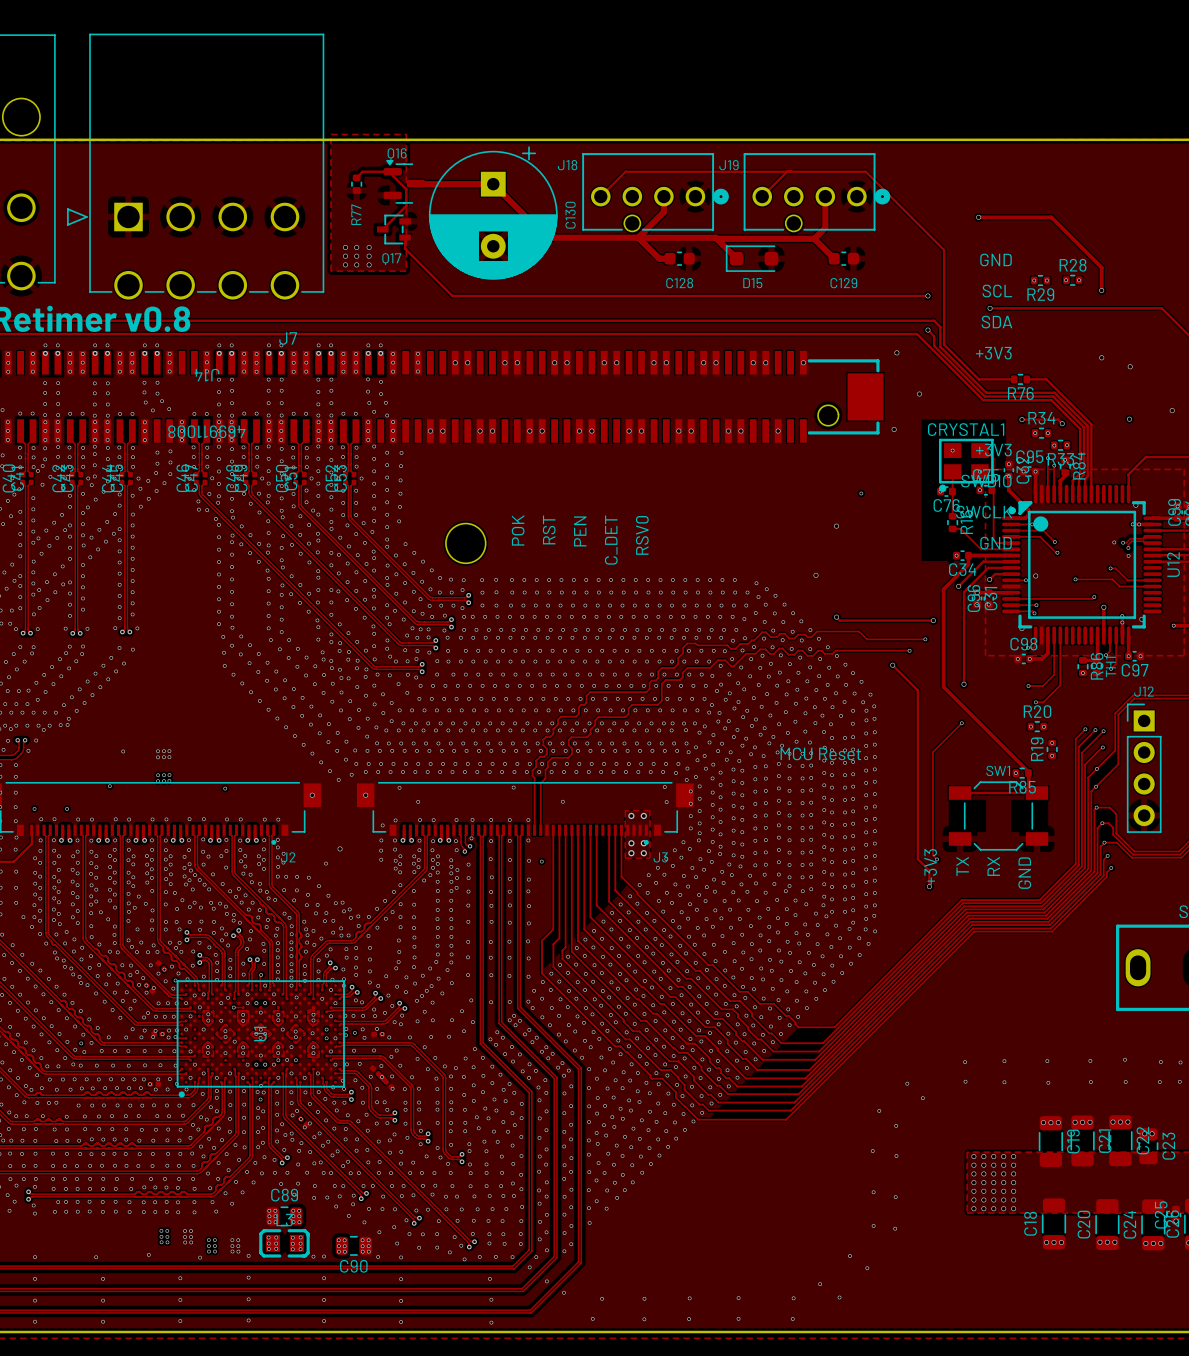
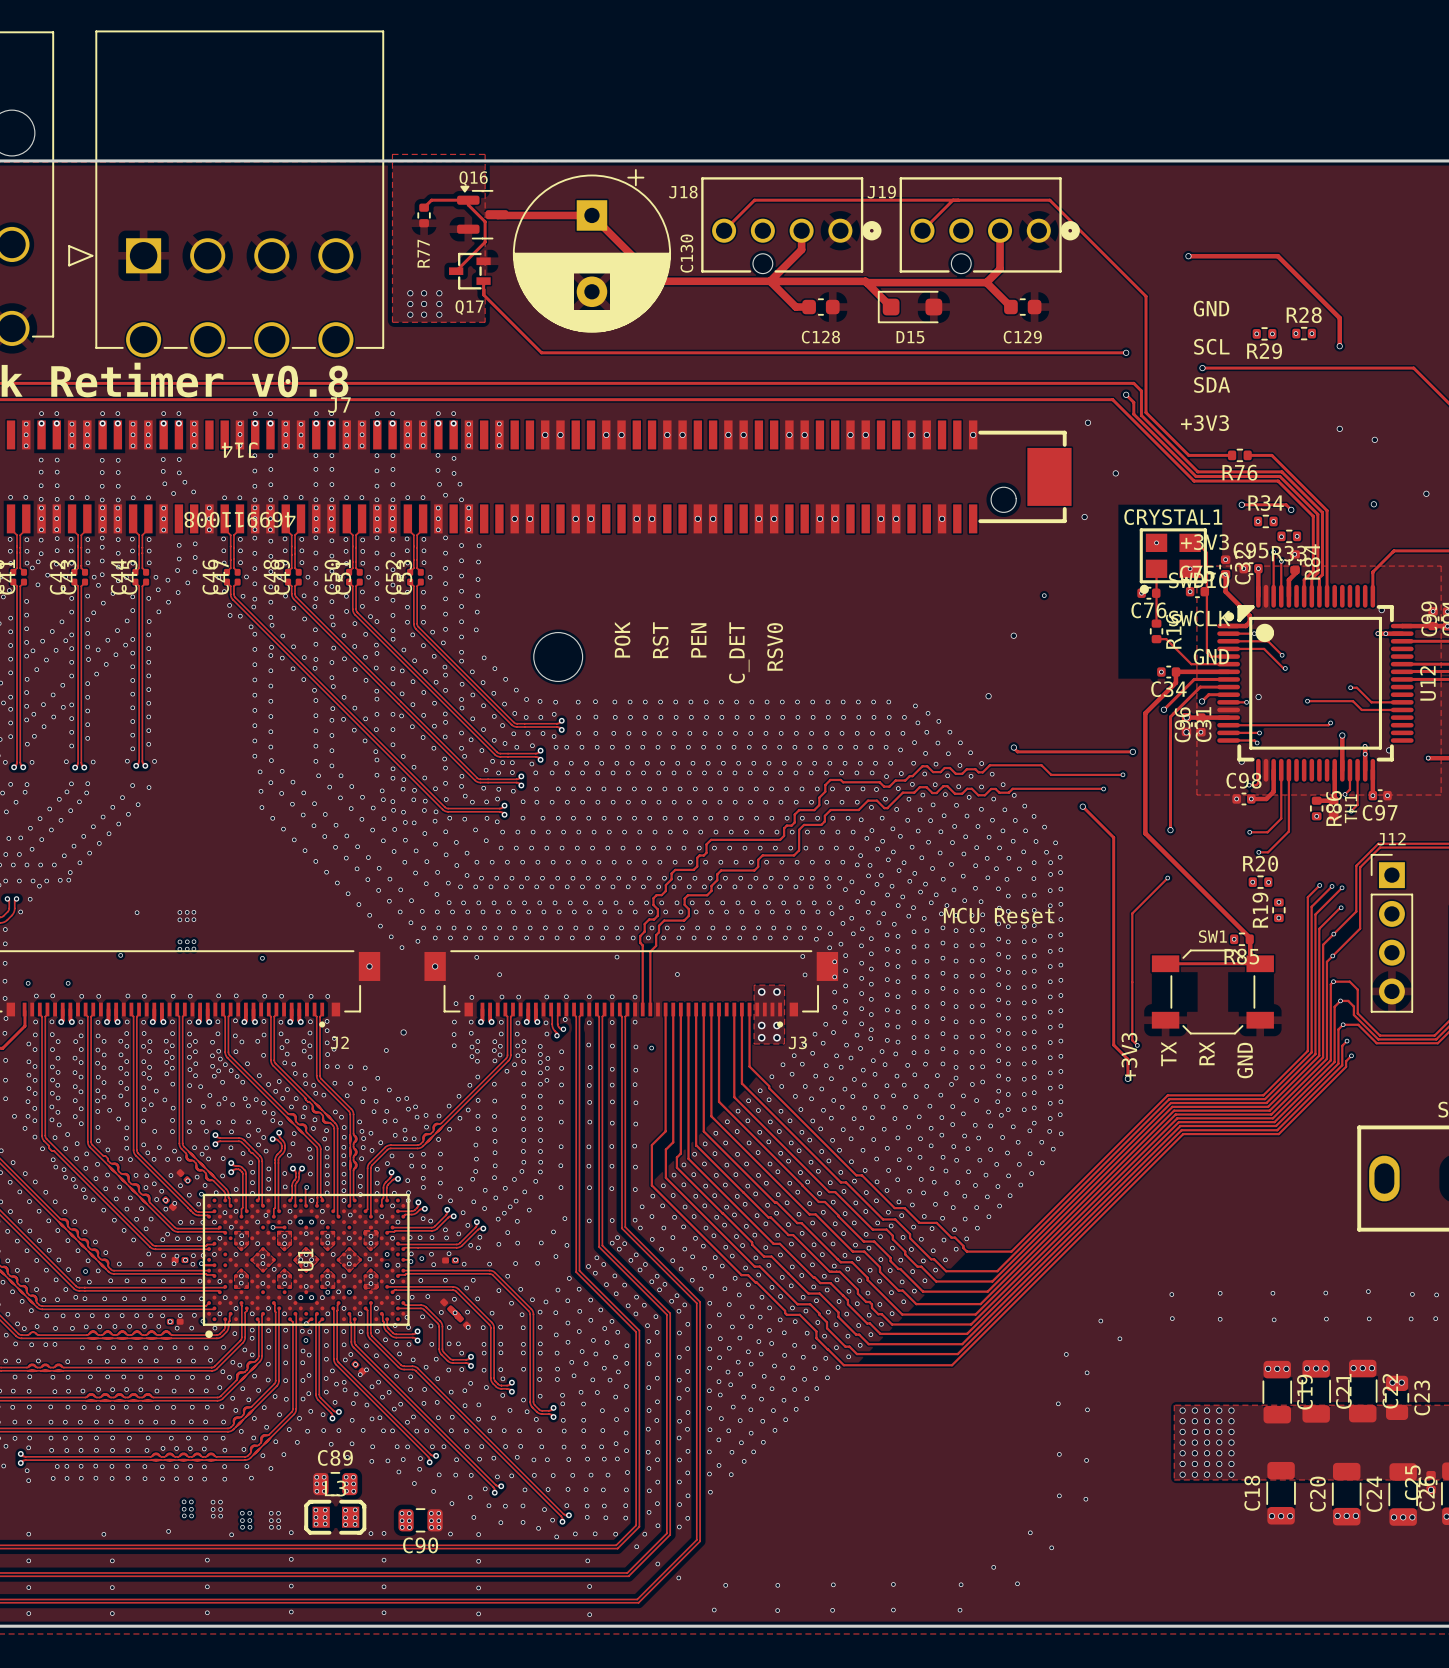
track: (1152, 536) (1130, 538) (1126, 542) (1123, 542) -> none
via: (1114, 542) -> none
via: (1123, 542) -> none
track: (1152, 543) (1131, 541) (1128, 544) (1128, 547) -> none
via: (1128, 547) -> none
via: (1128, 555) -> none

